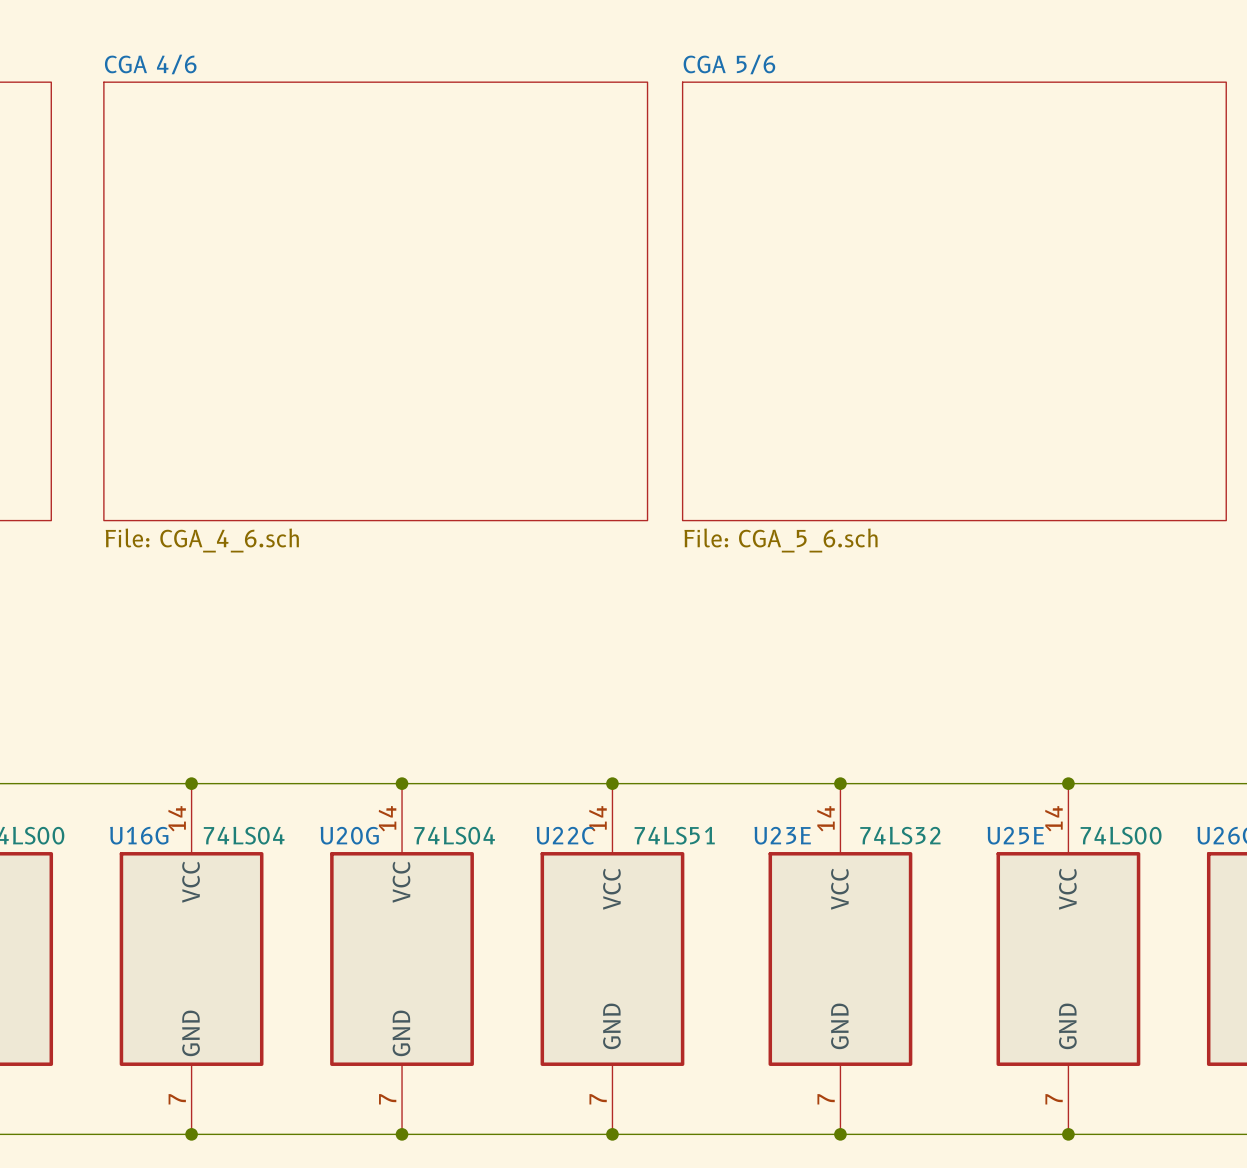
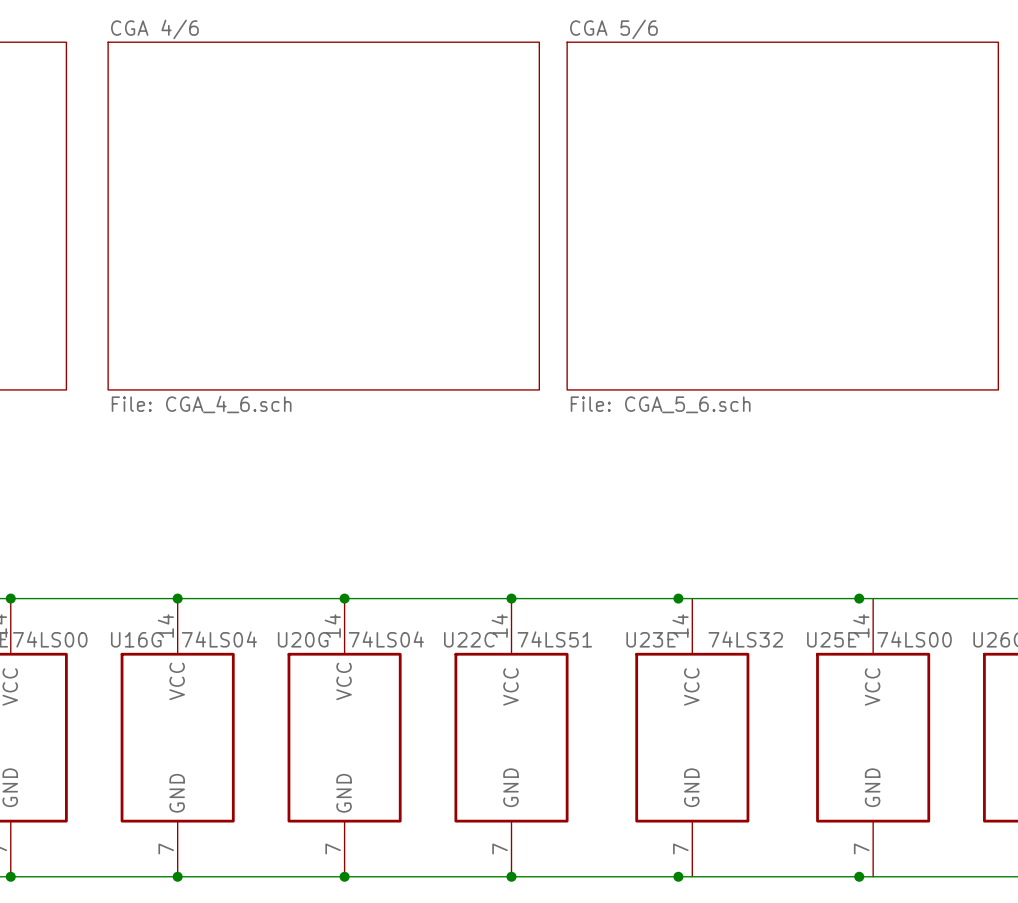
junction position: (840, 783) -> (678, 598)
junction position: (1068, 783) -> (859, 598)
junction position: (840, 1134) -> (678, 876)
junction position: (1068, 1134) -> (859, 876)

